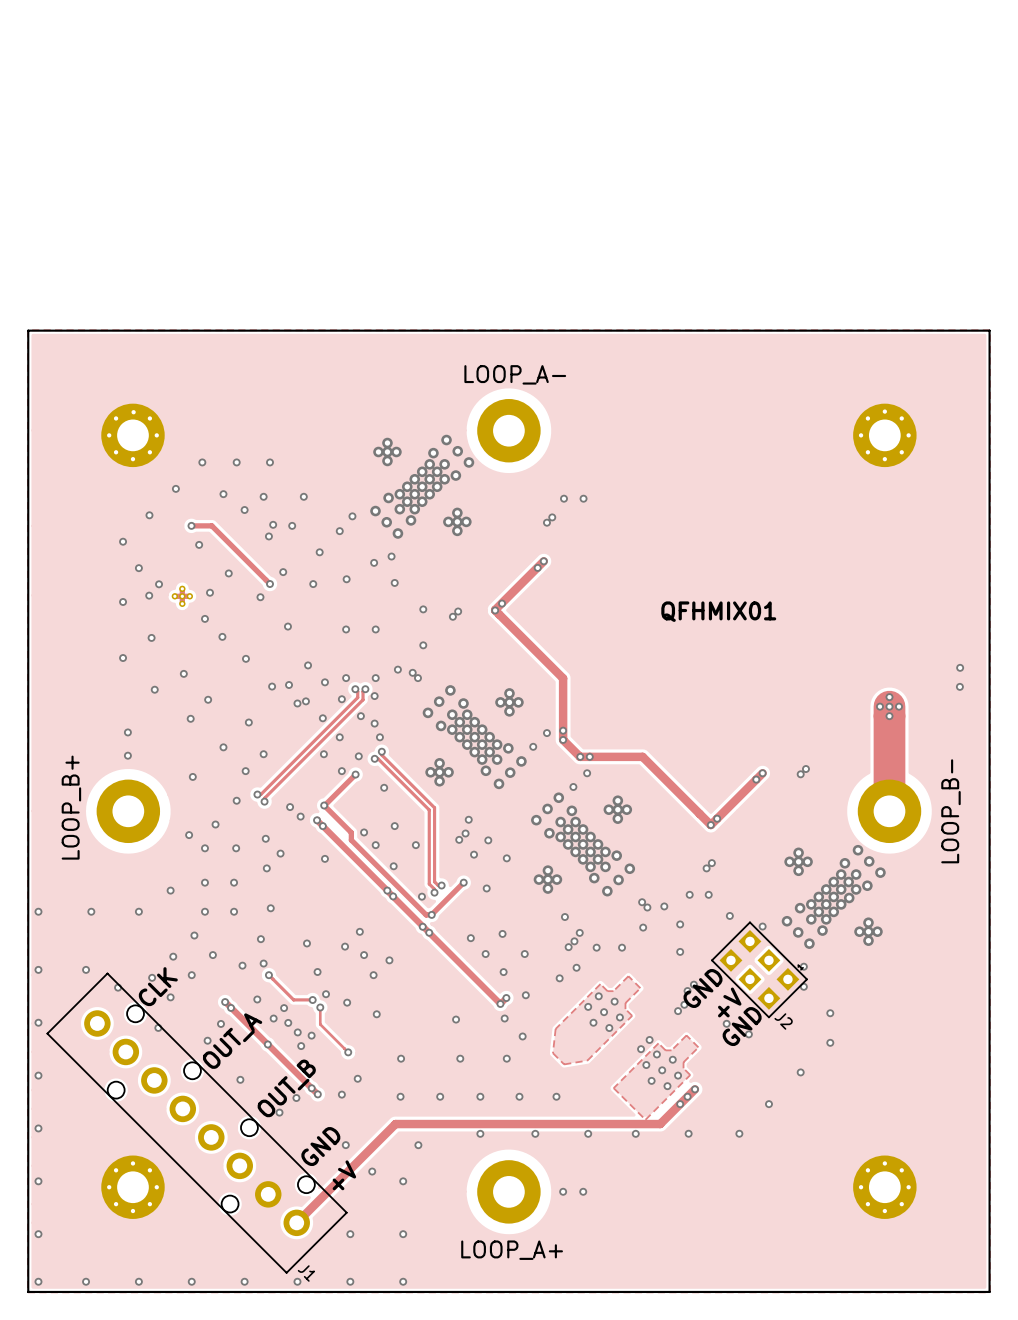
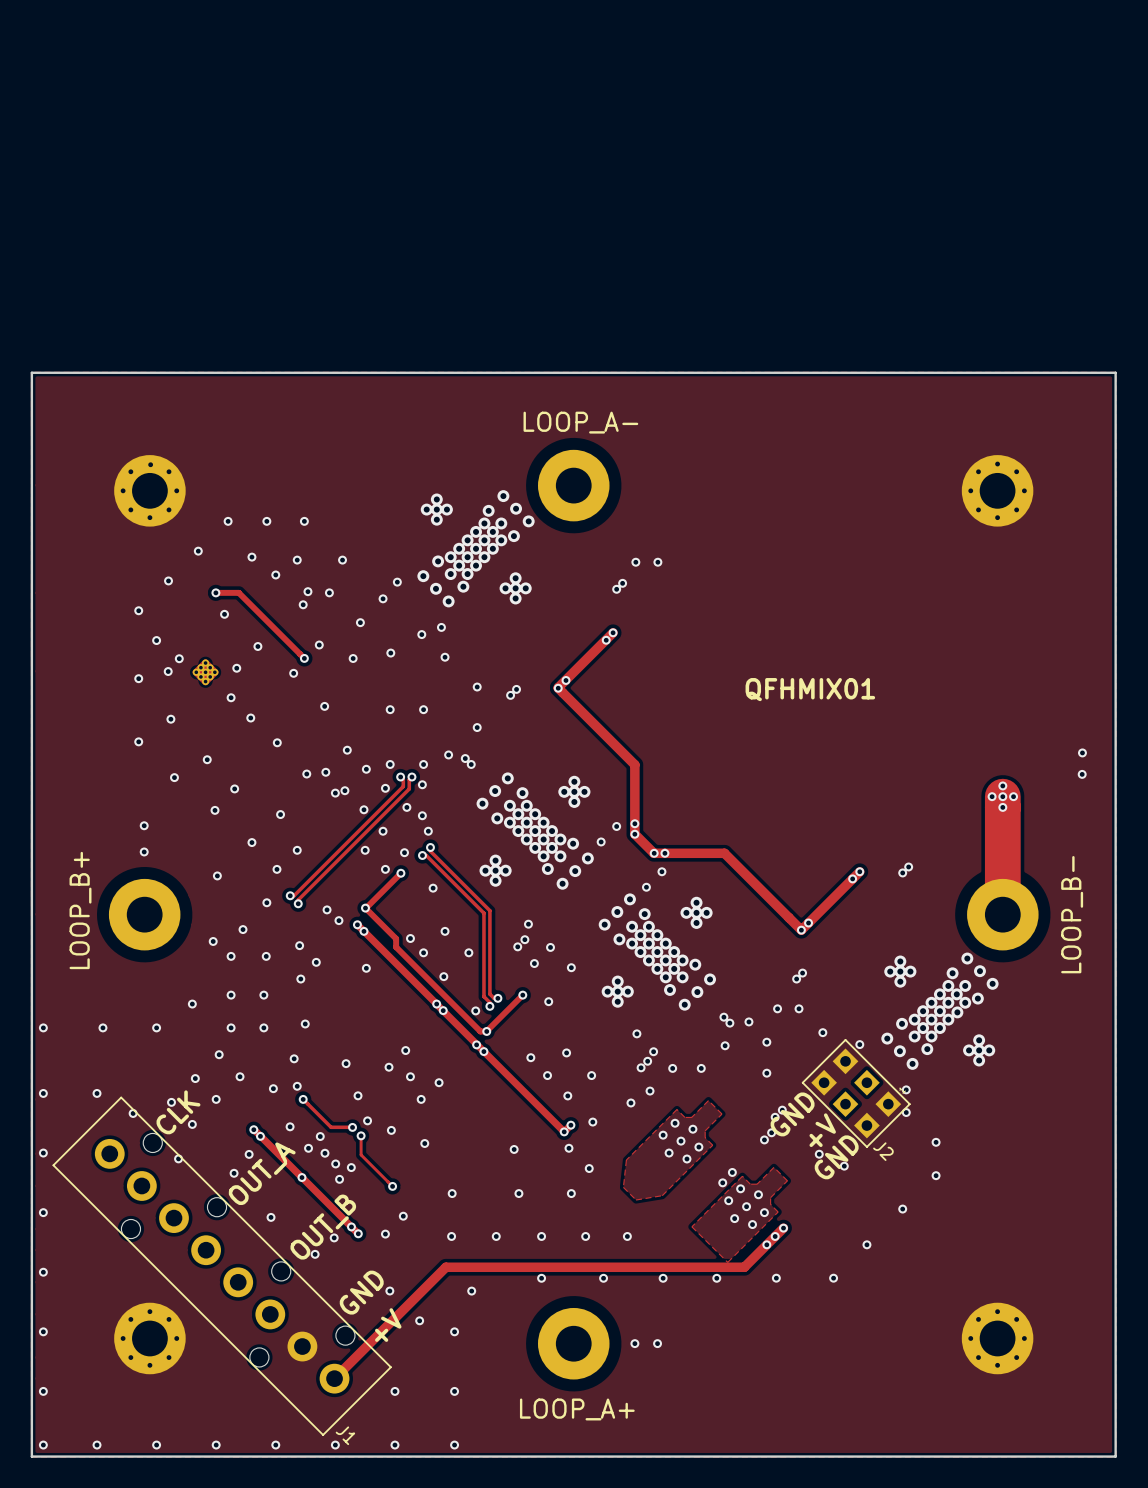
part footprint: [171, 585, 193, 607] -> [192, 659, 219, 686]

